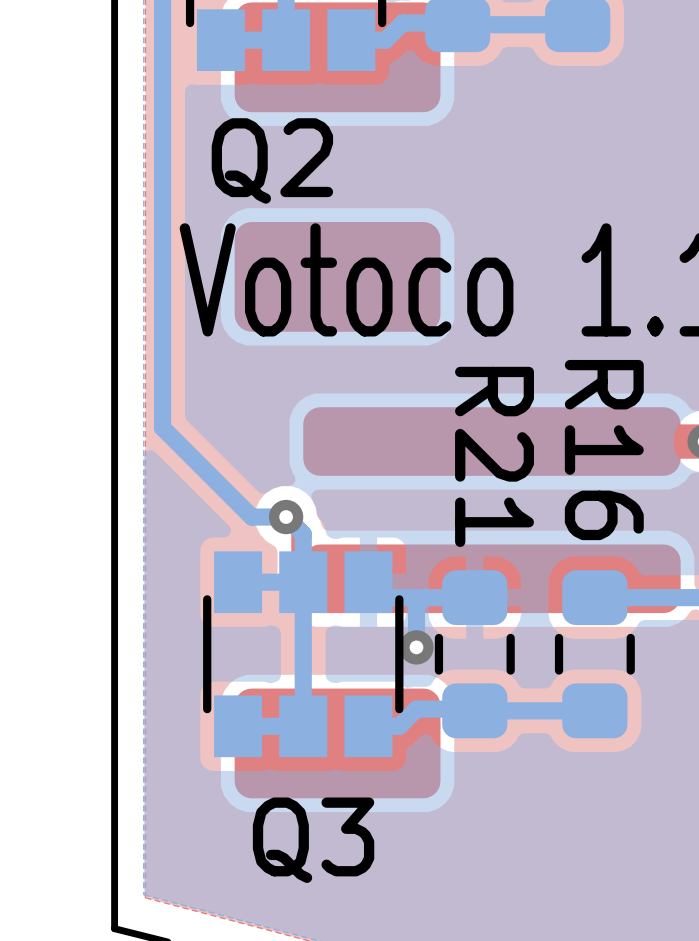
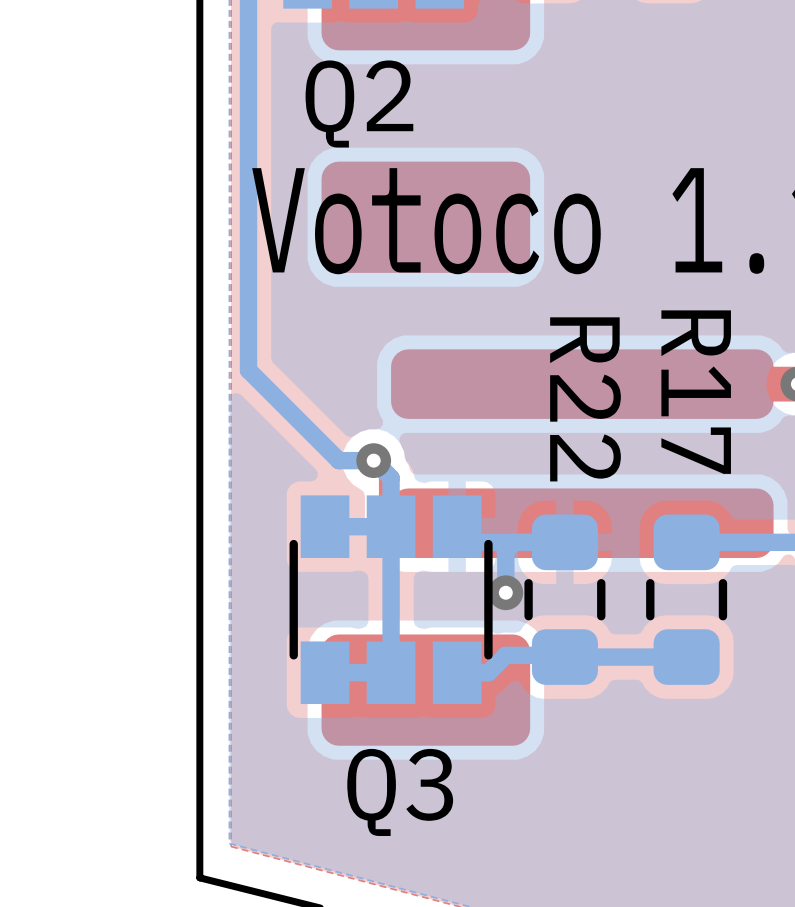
R16 name: R16 (604, 450) -> R17 (696, 392)
R21 name: R21 (494, 456) -> R22 (585, 399)

